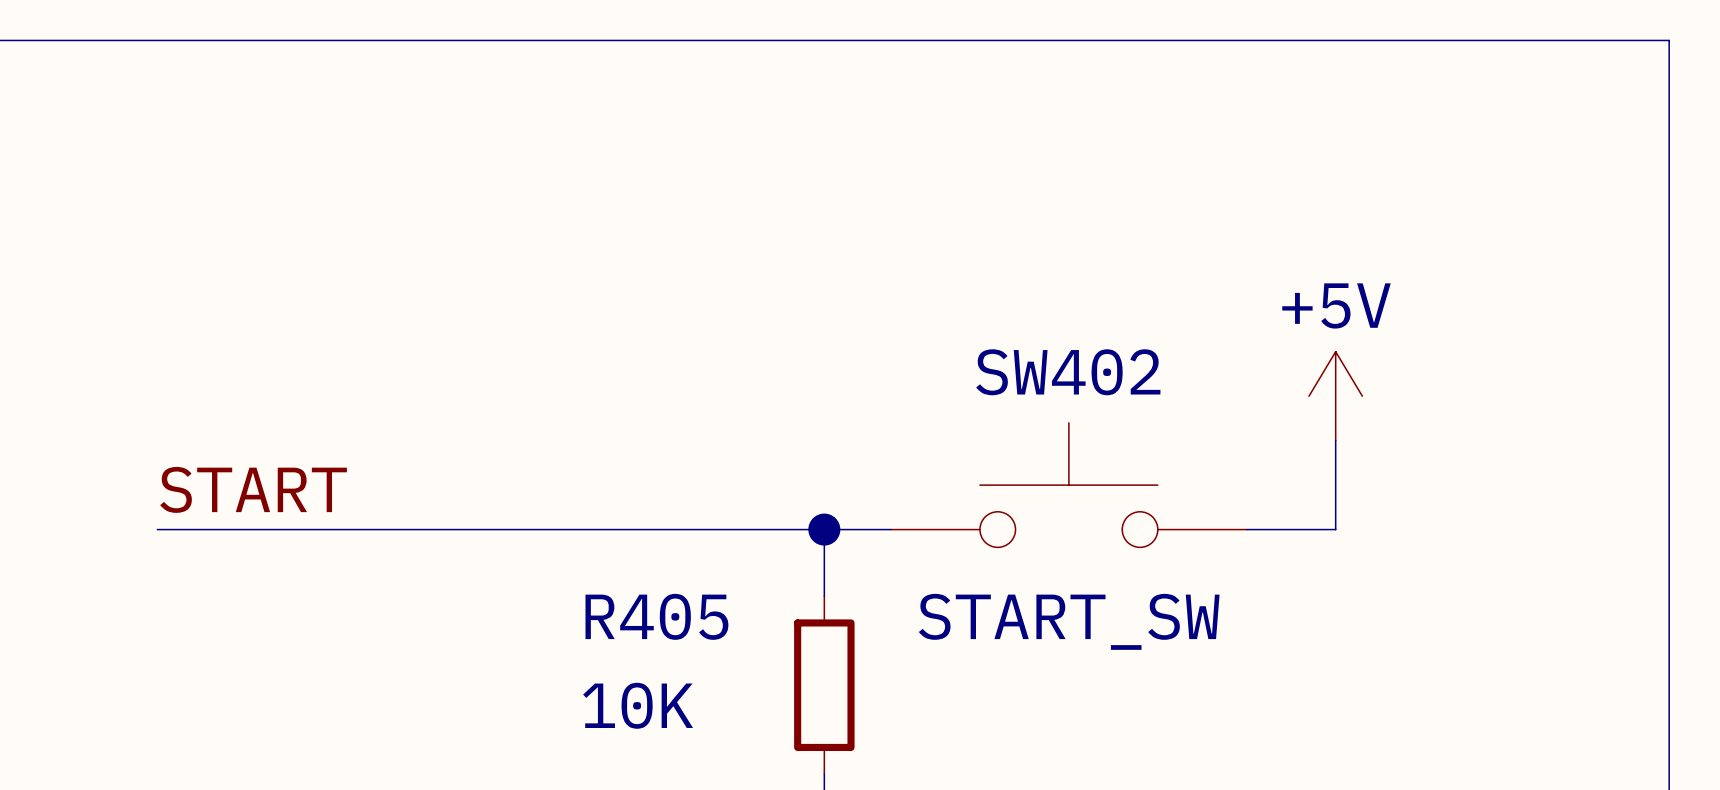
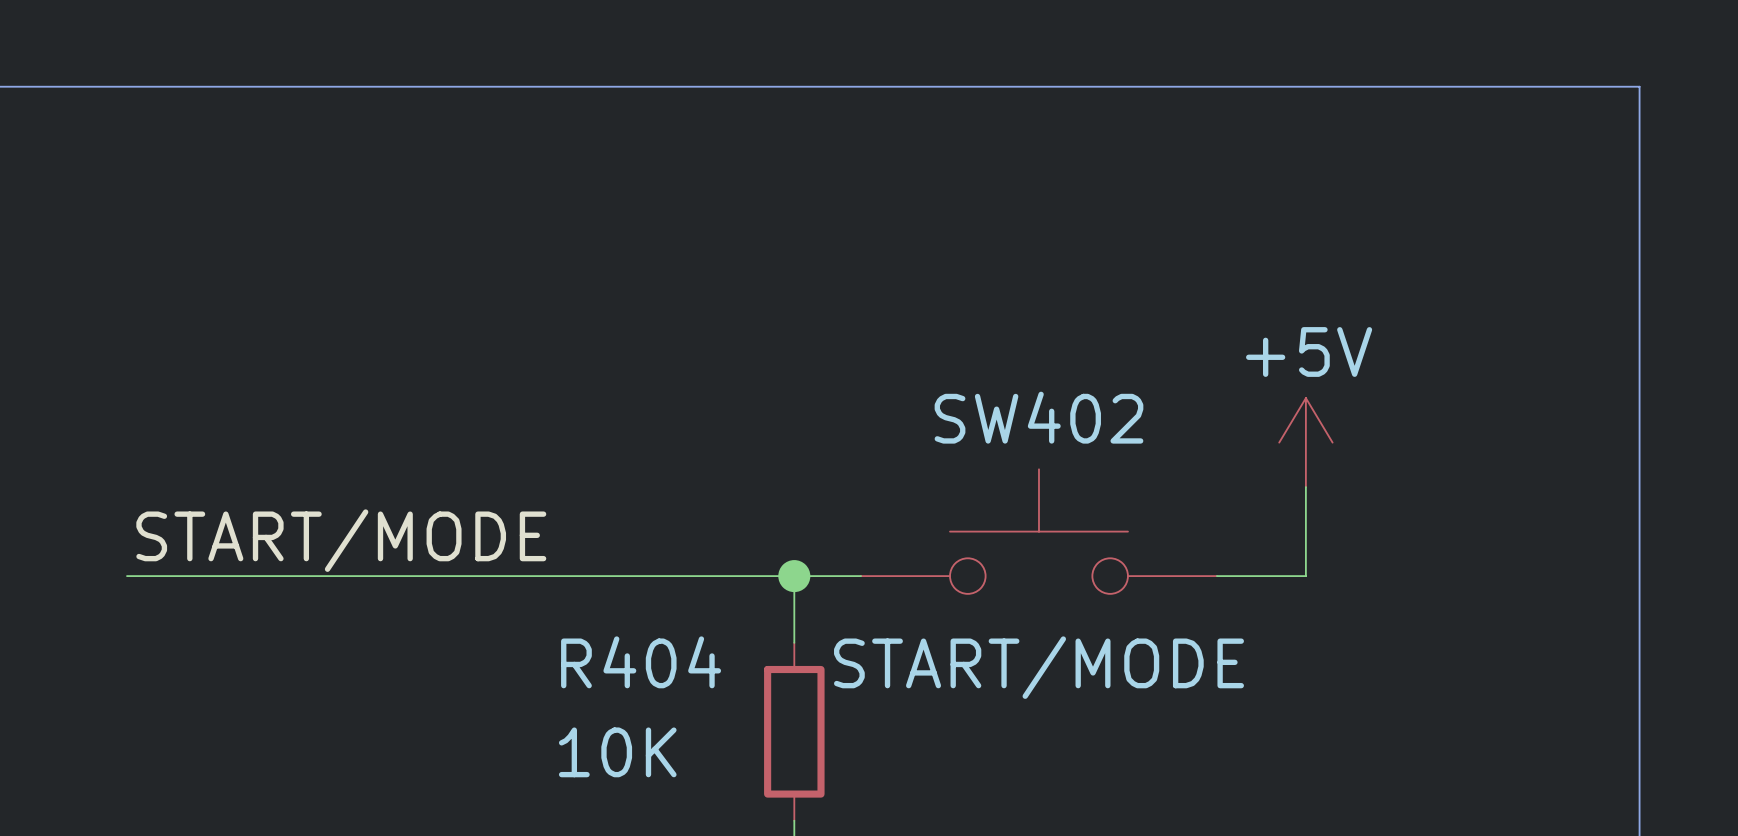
label: START (253, 489) -> START/MODE (341, 540)
R405 name: R405 (656, 616) -> R404 (641, 662)
SW402 value: START_SW (1069, 621) -> START/MODE (1038, 667)

